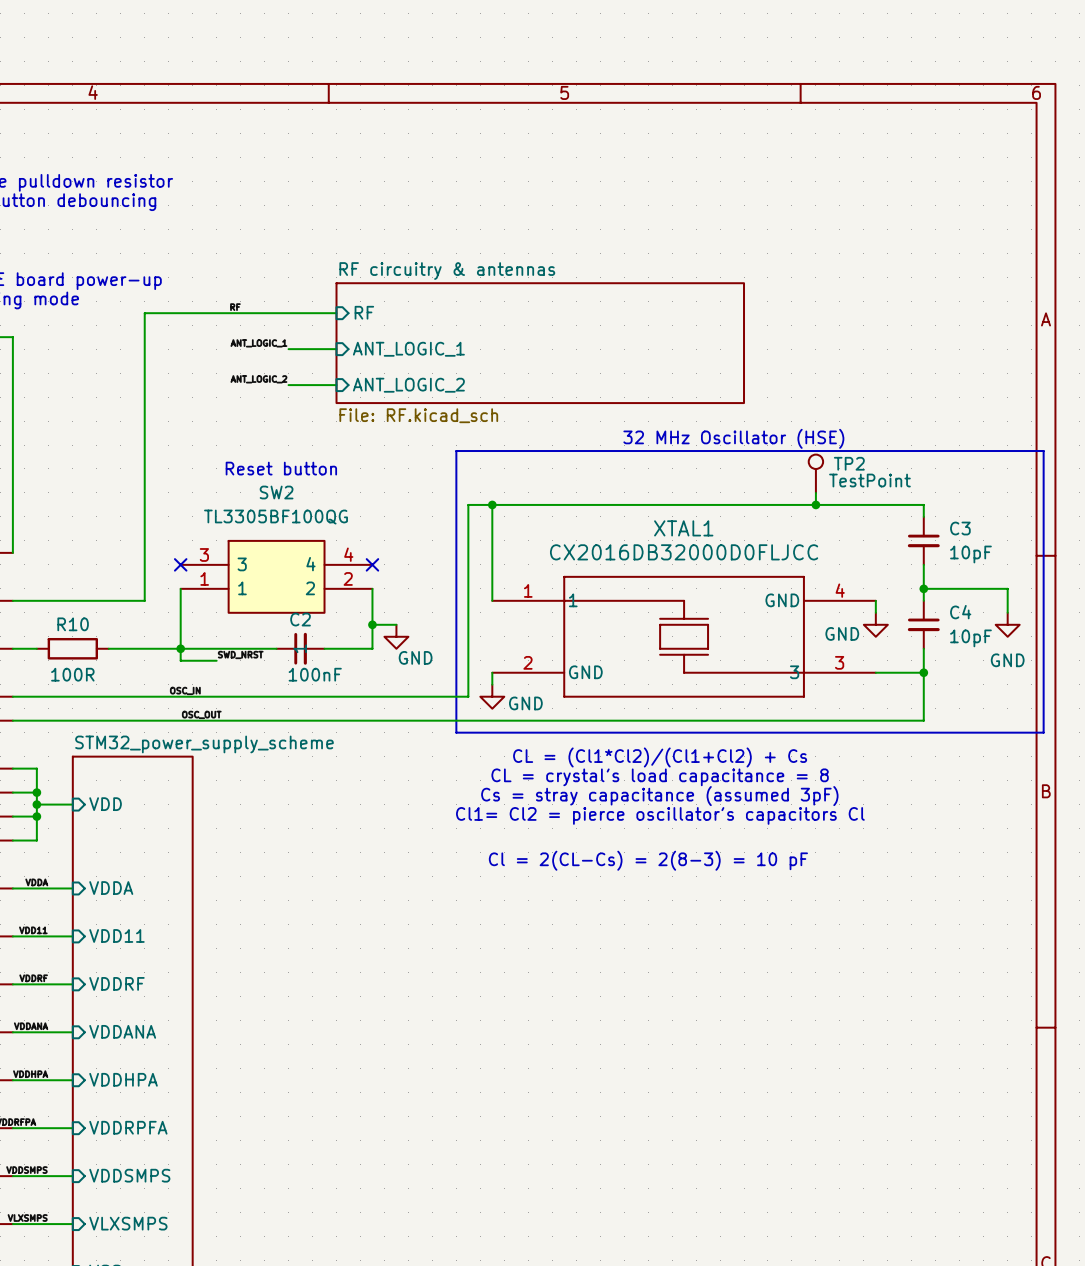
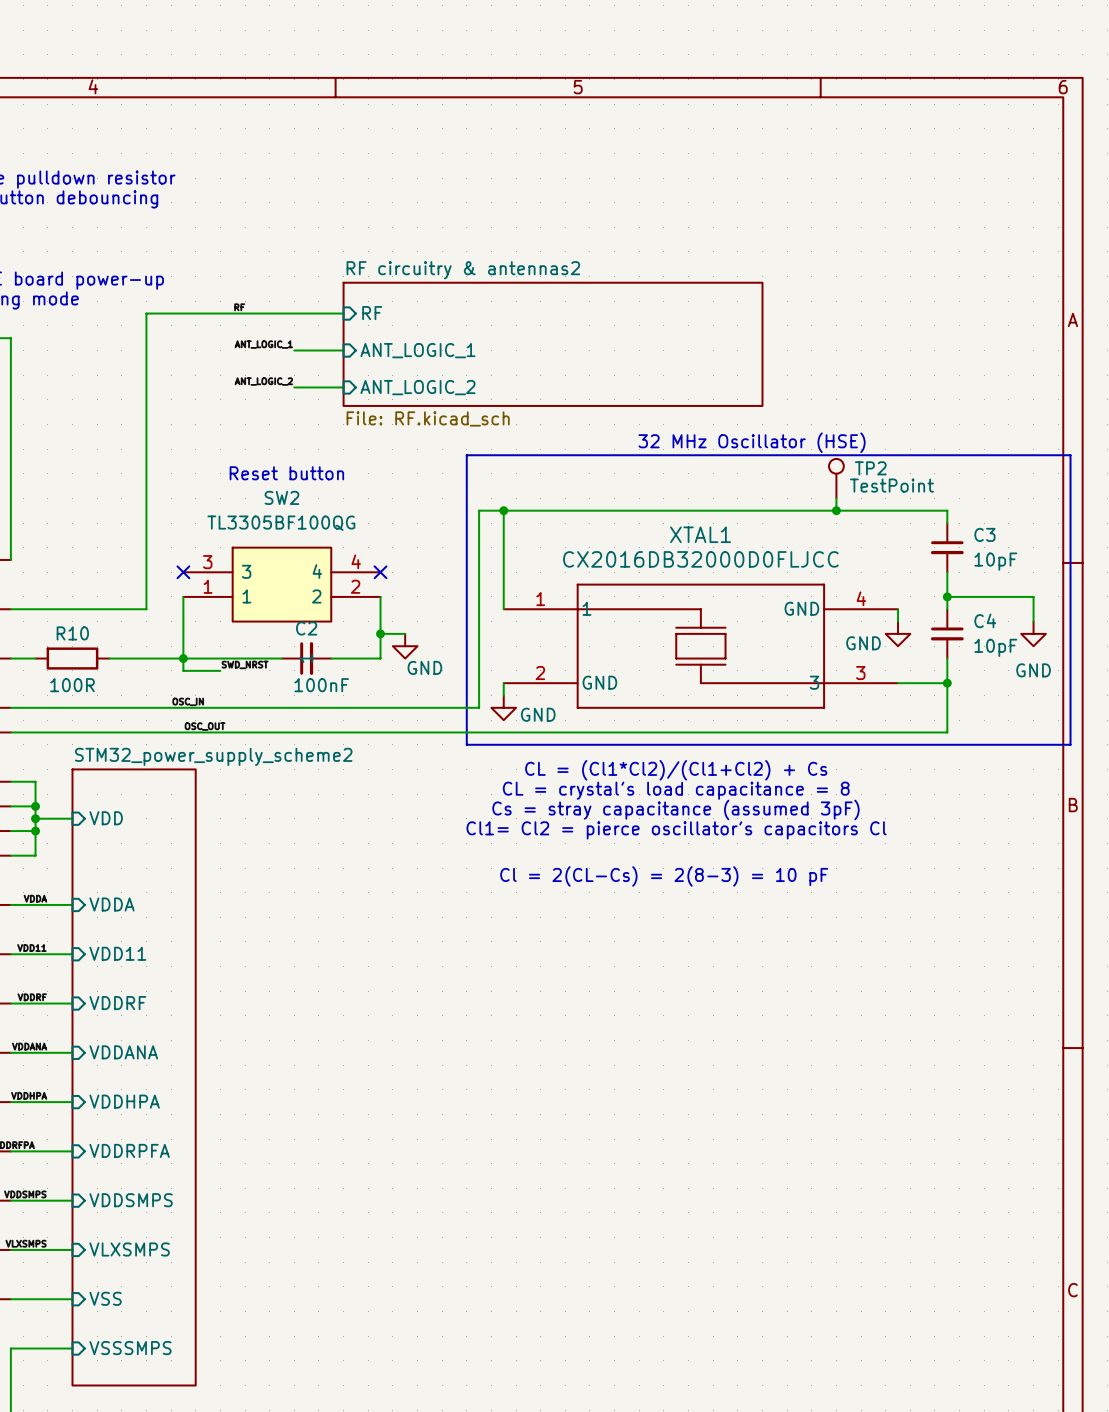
sheet RF circuitry & antennas name: RF circuitry & antennas (447, 271) -> RF circuitry & antennas2 (463, 270)
sheet STM32_power_supply_scheme name: STM32_power_supply_scheme (204, 744) -> STM32_power_supply_scheme2 (213, 756)

